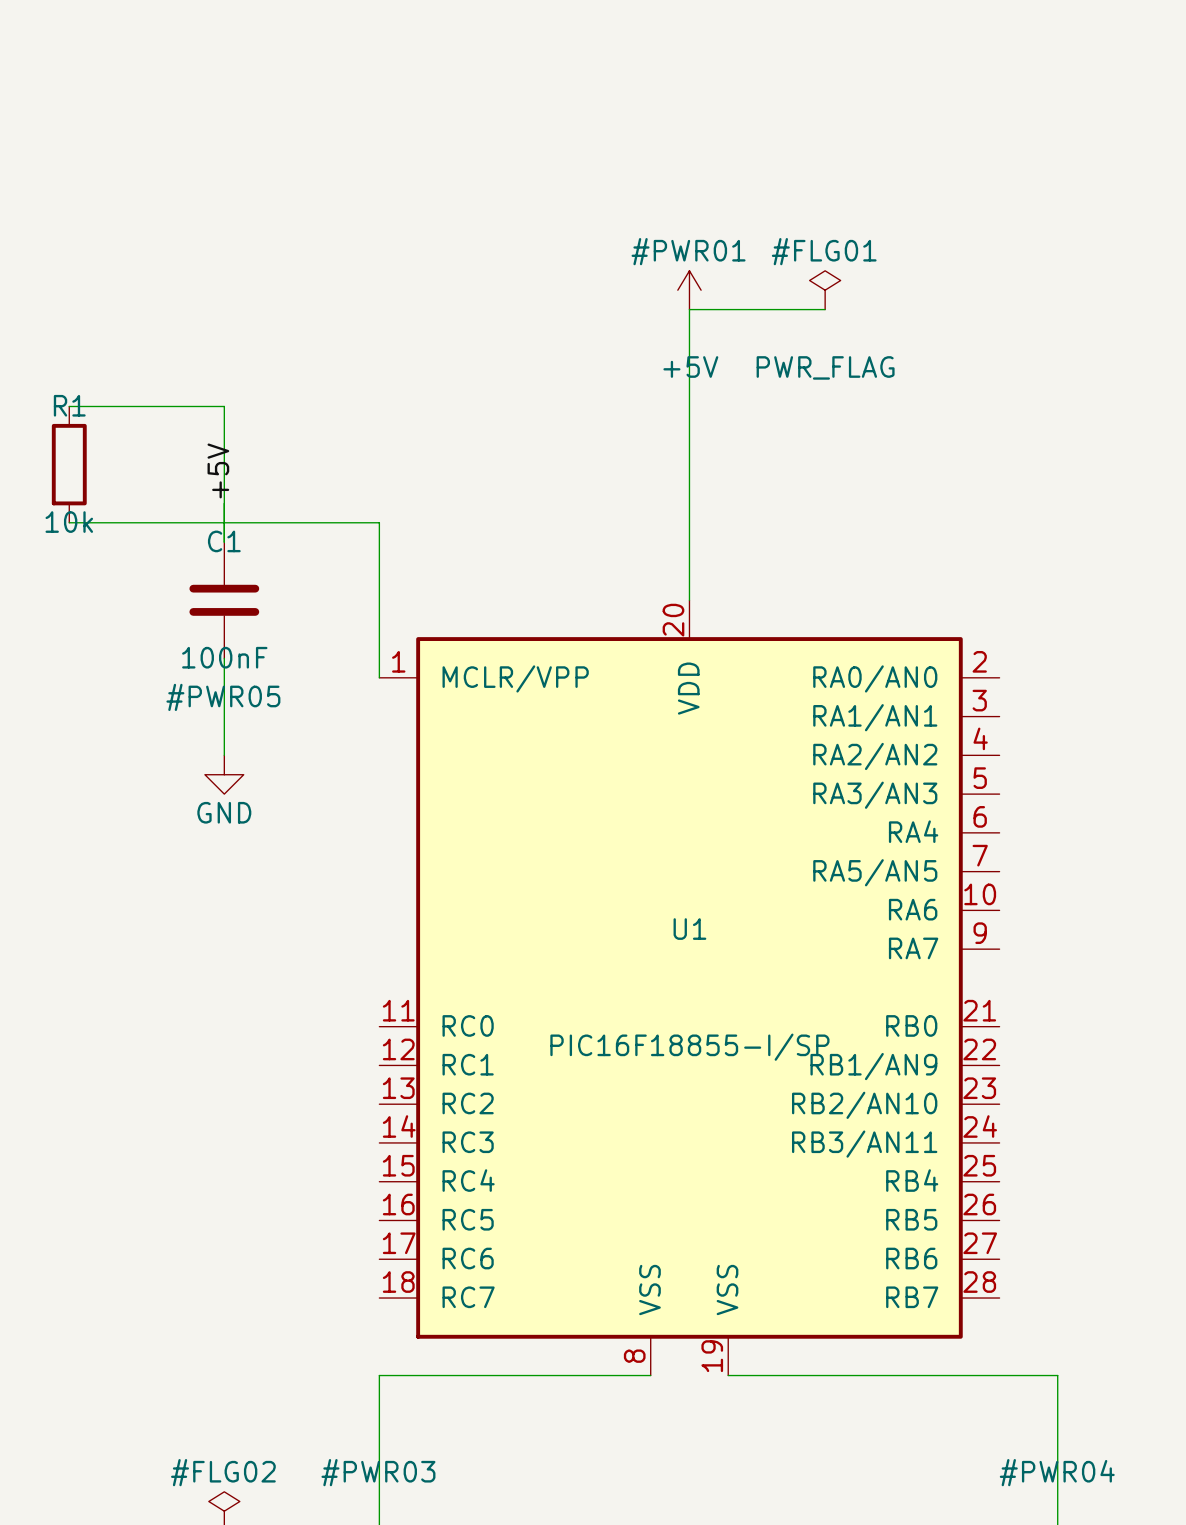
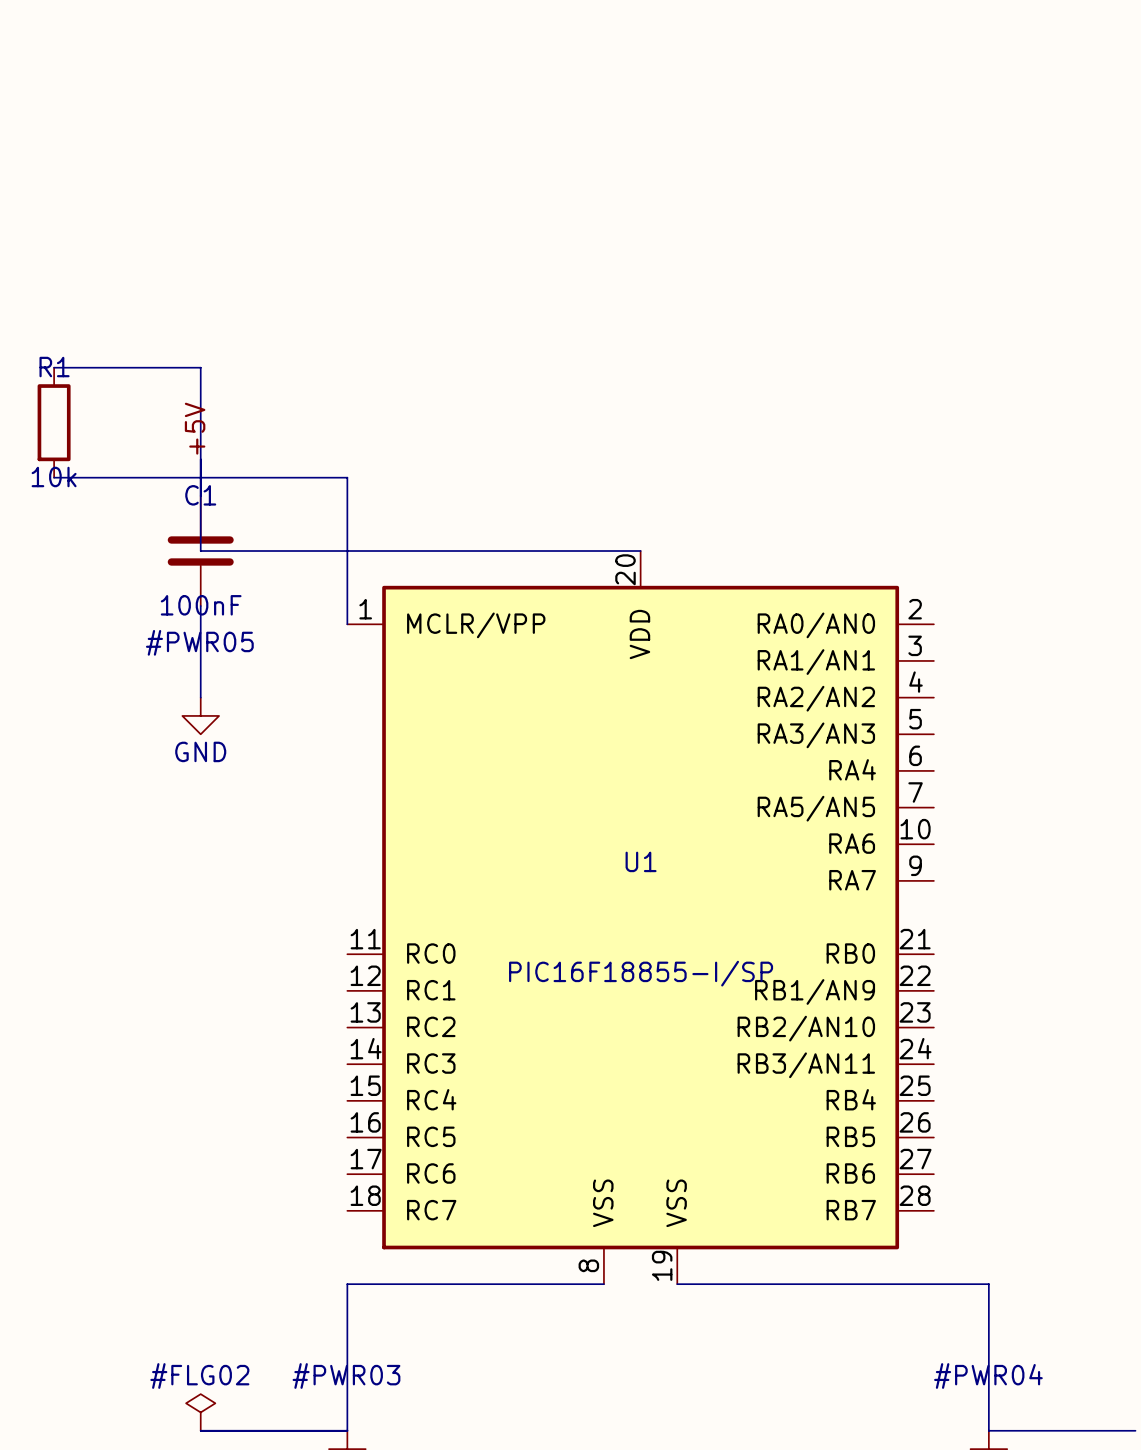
#PWR01: +5V (689, 290) -> none
#FLG01: PWR_FLAG (825, 290) -> none
wire: (825, 309) (689, 309) (689, 600) -> (200, 496) (200, 551) (640, 551)

